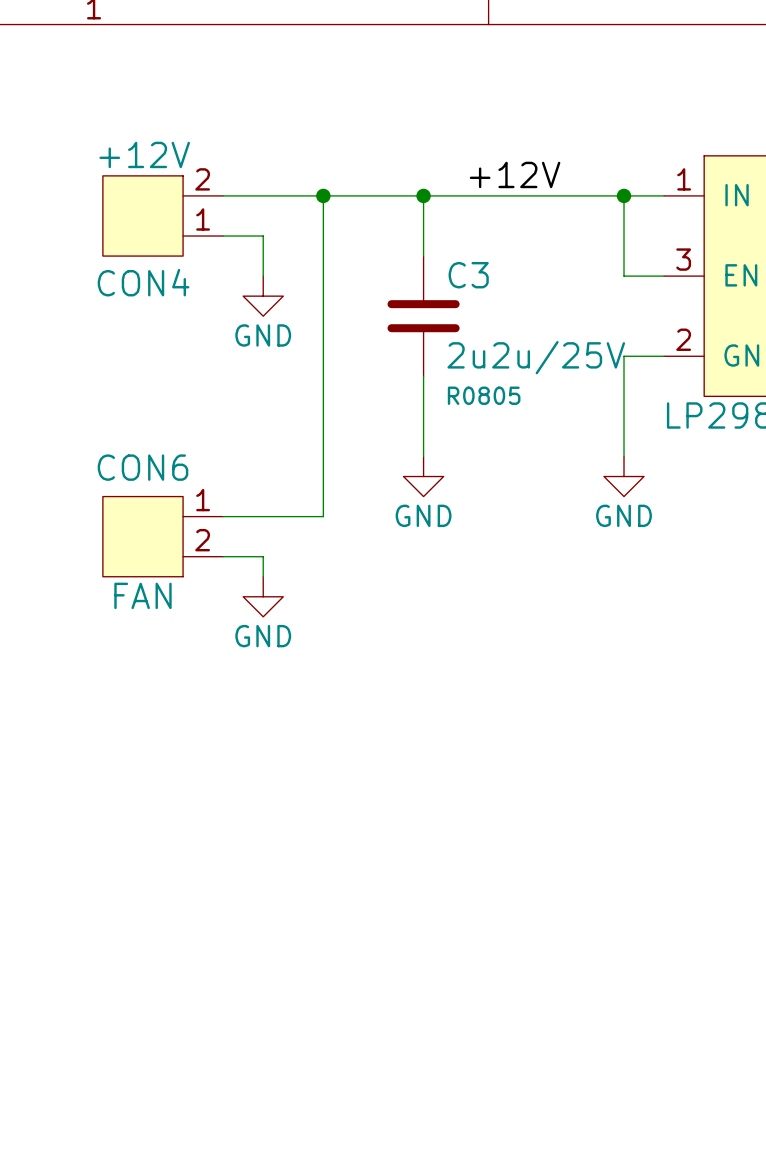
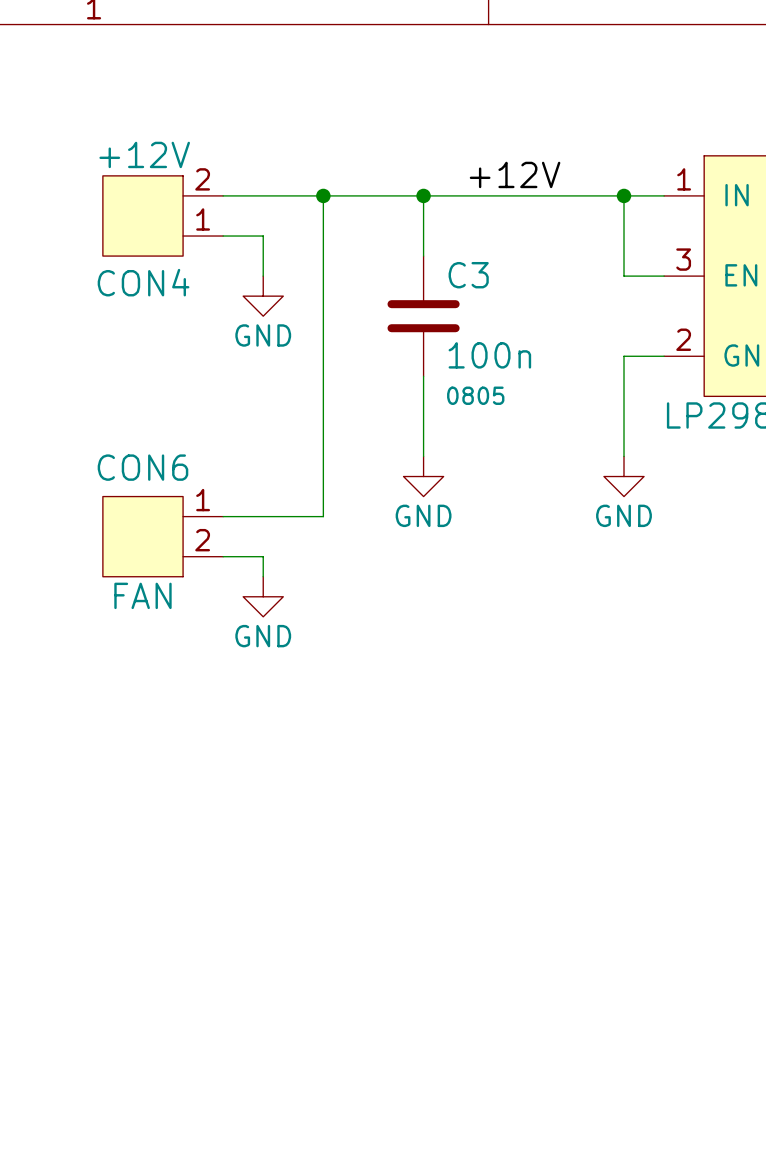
C3 value: 2u2u/25V (536, 357) -> 100n (489, 355)
C3 text: R0805 (484, 395) -> 0805 (475, 395)

